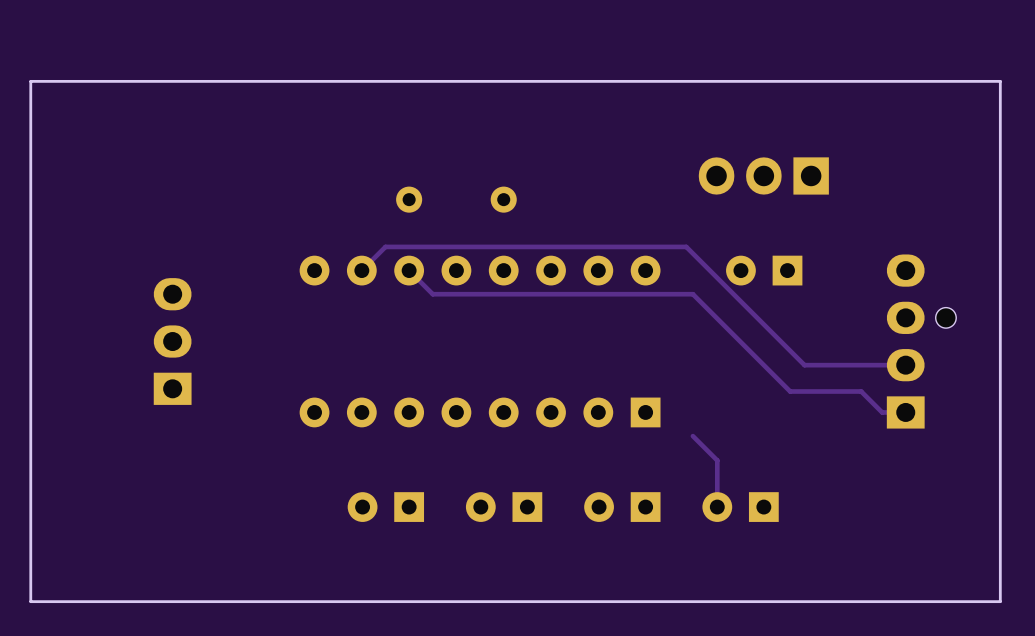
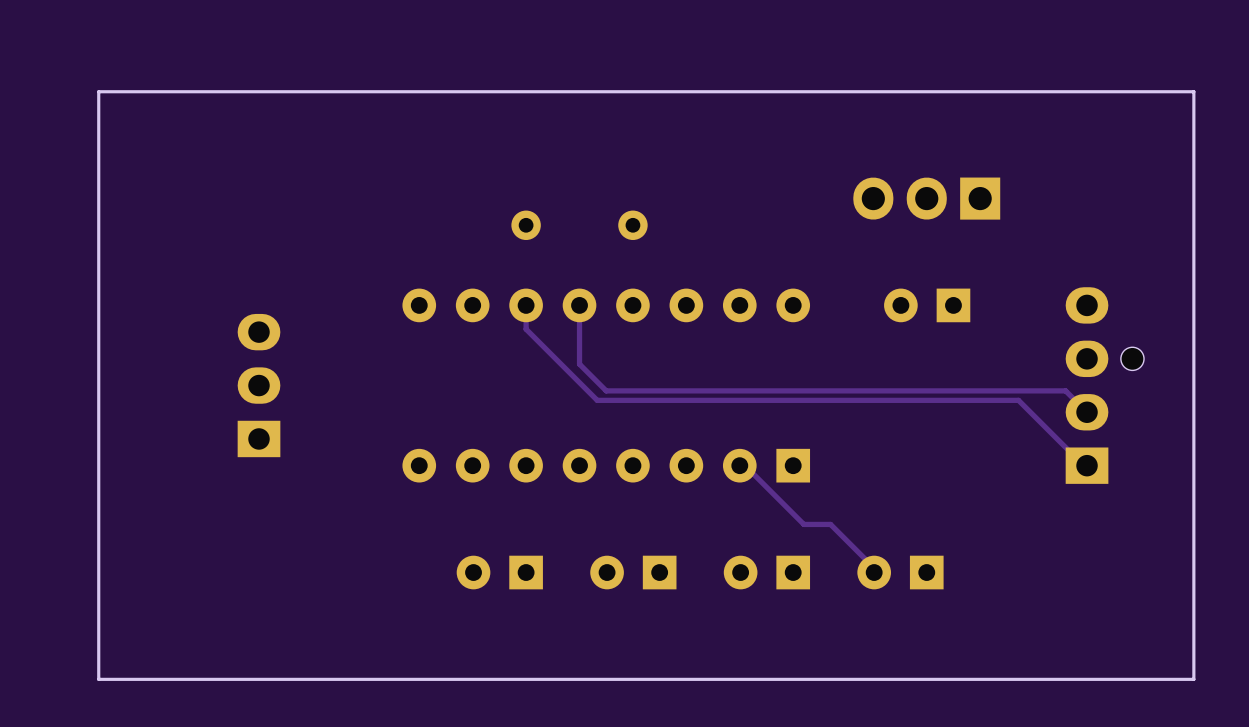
track: (361, 270) (385, 246) (686, 246) (804, 365) (905, 365) -> (579, 305) (579, 364) (606, 390) (1065, 390) (1087, 412)
track: (409, 270) (432, 294) (692, 294) (790, 391) (861, 391) (882, 412) (902, 412) -> (526, 305) (526, 329) (597, 400) (1018, 400) (1083, 465)
track: (692, 436) (717, 460) (717, 503) -> (739, 465) (745, 465) (803, 524) (830, 524) (874, 568)

